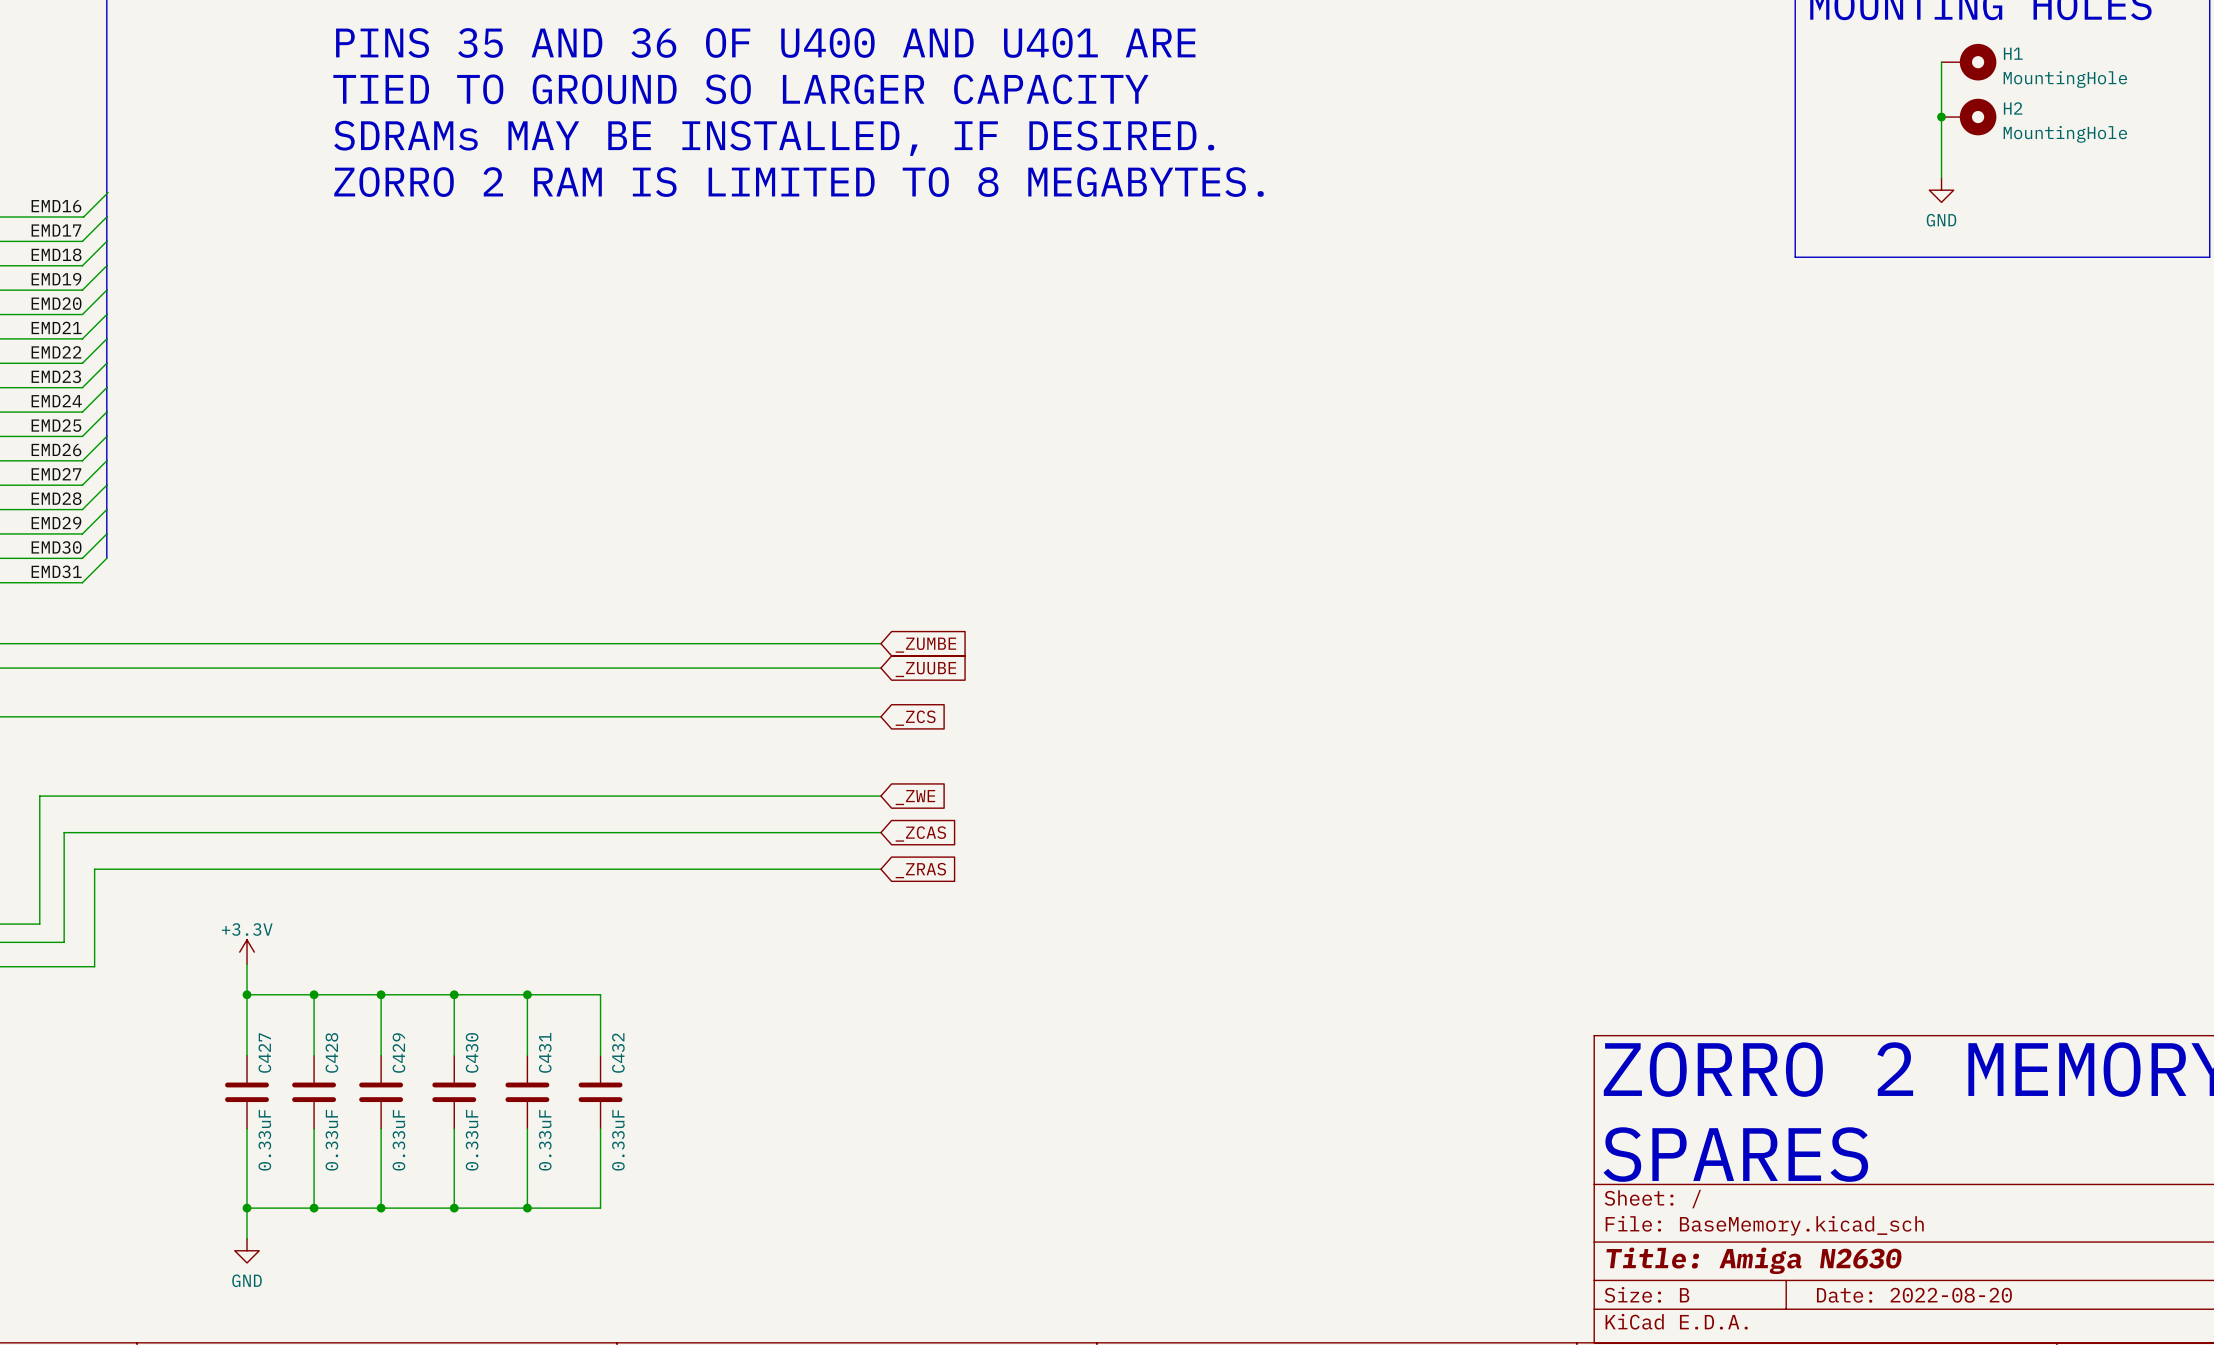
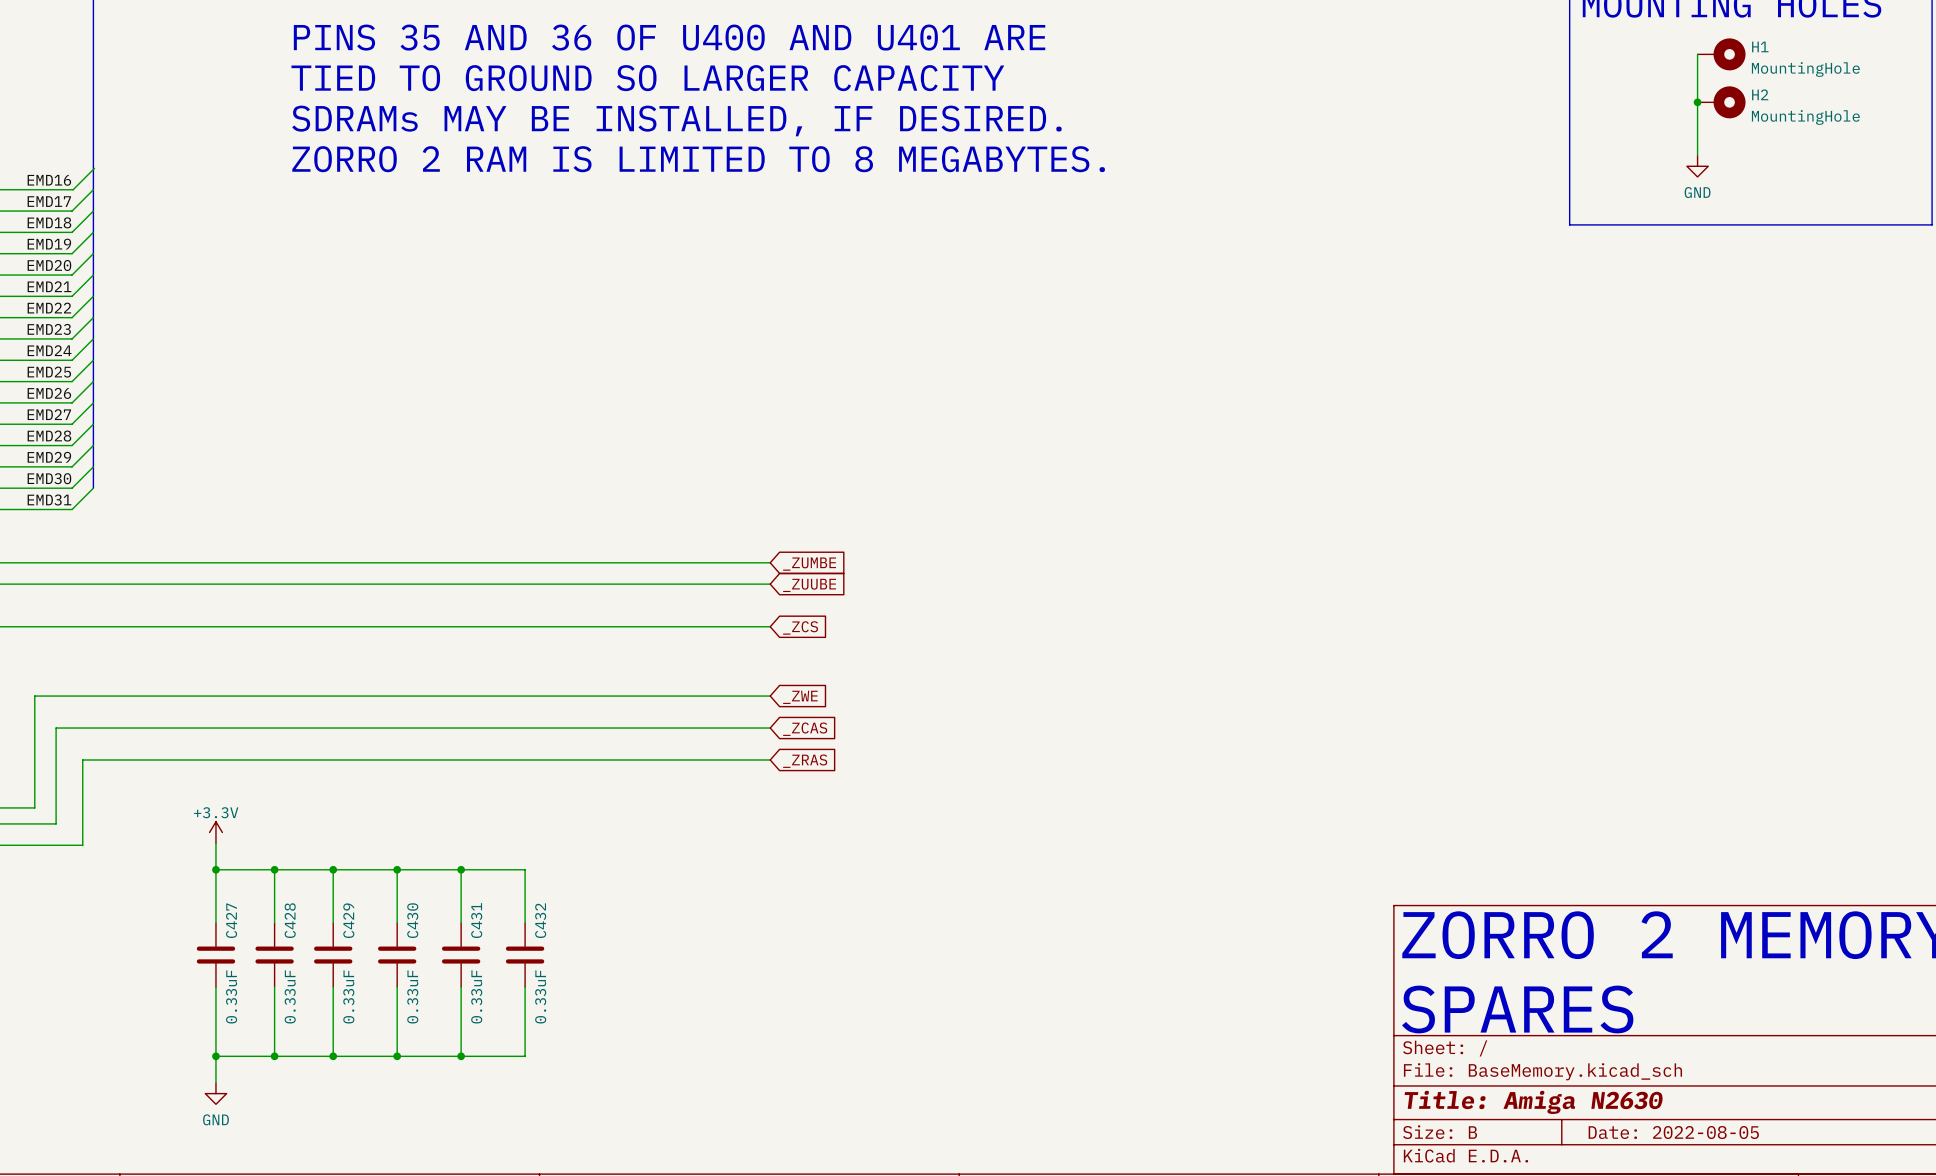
title block: Date: 2022-08-20 (1914, 1295) -> Date: 2022-08-05 (1673, 1132)

